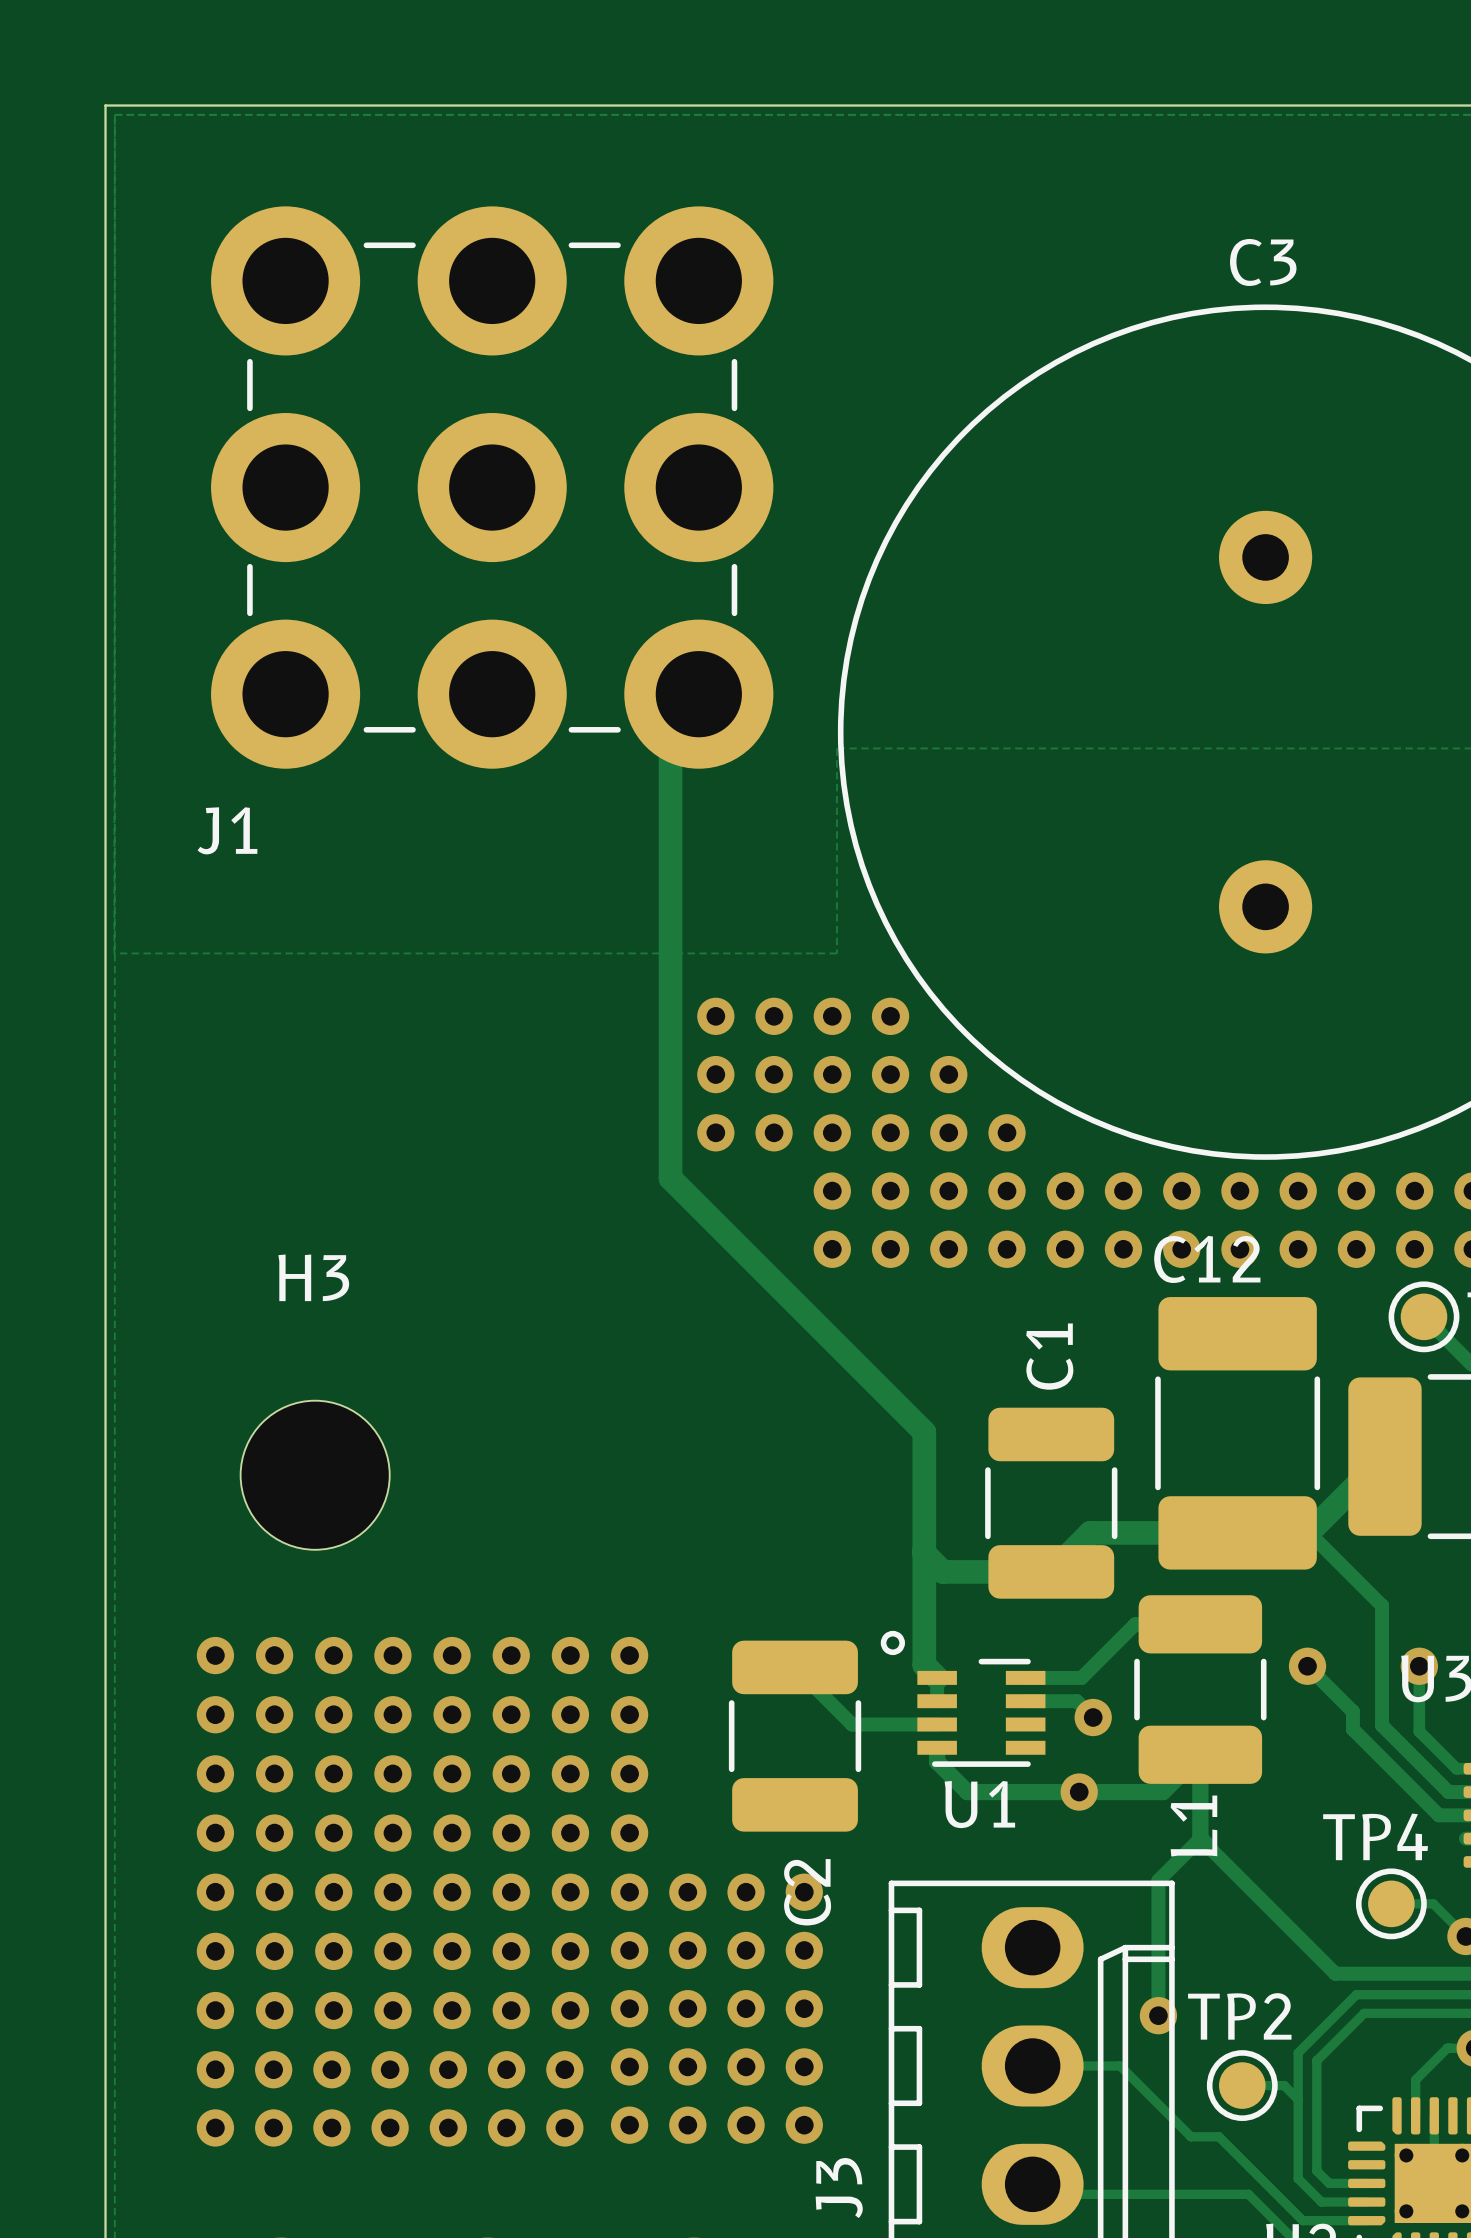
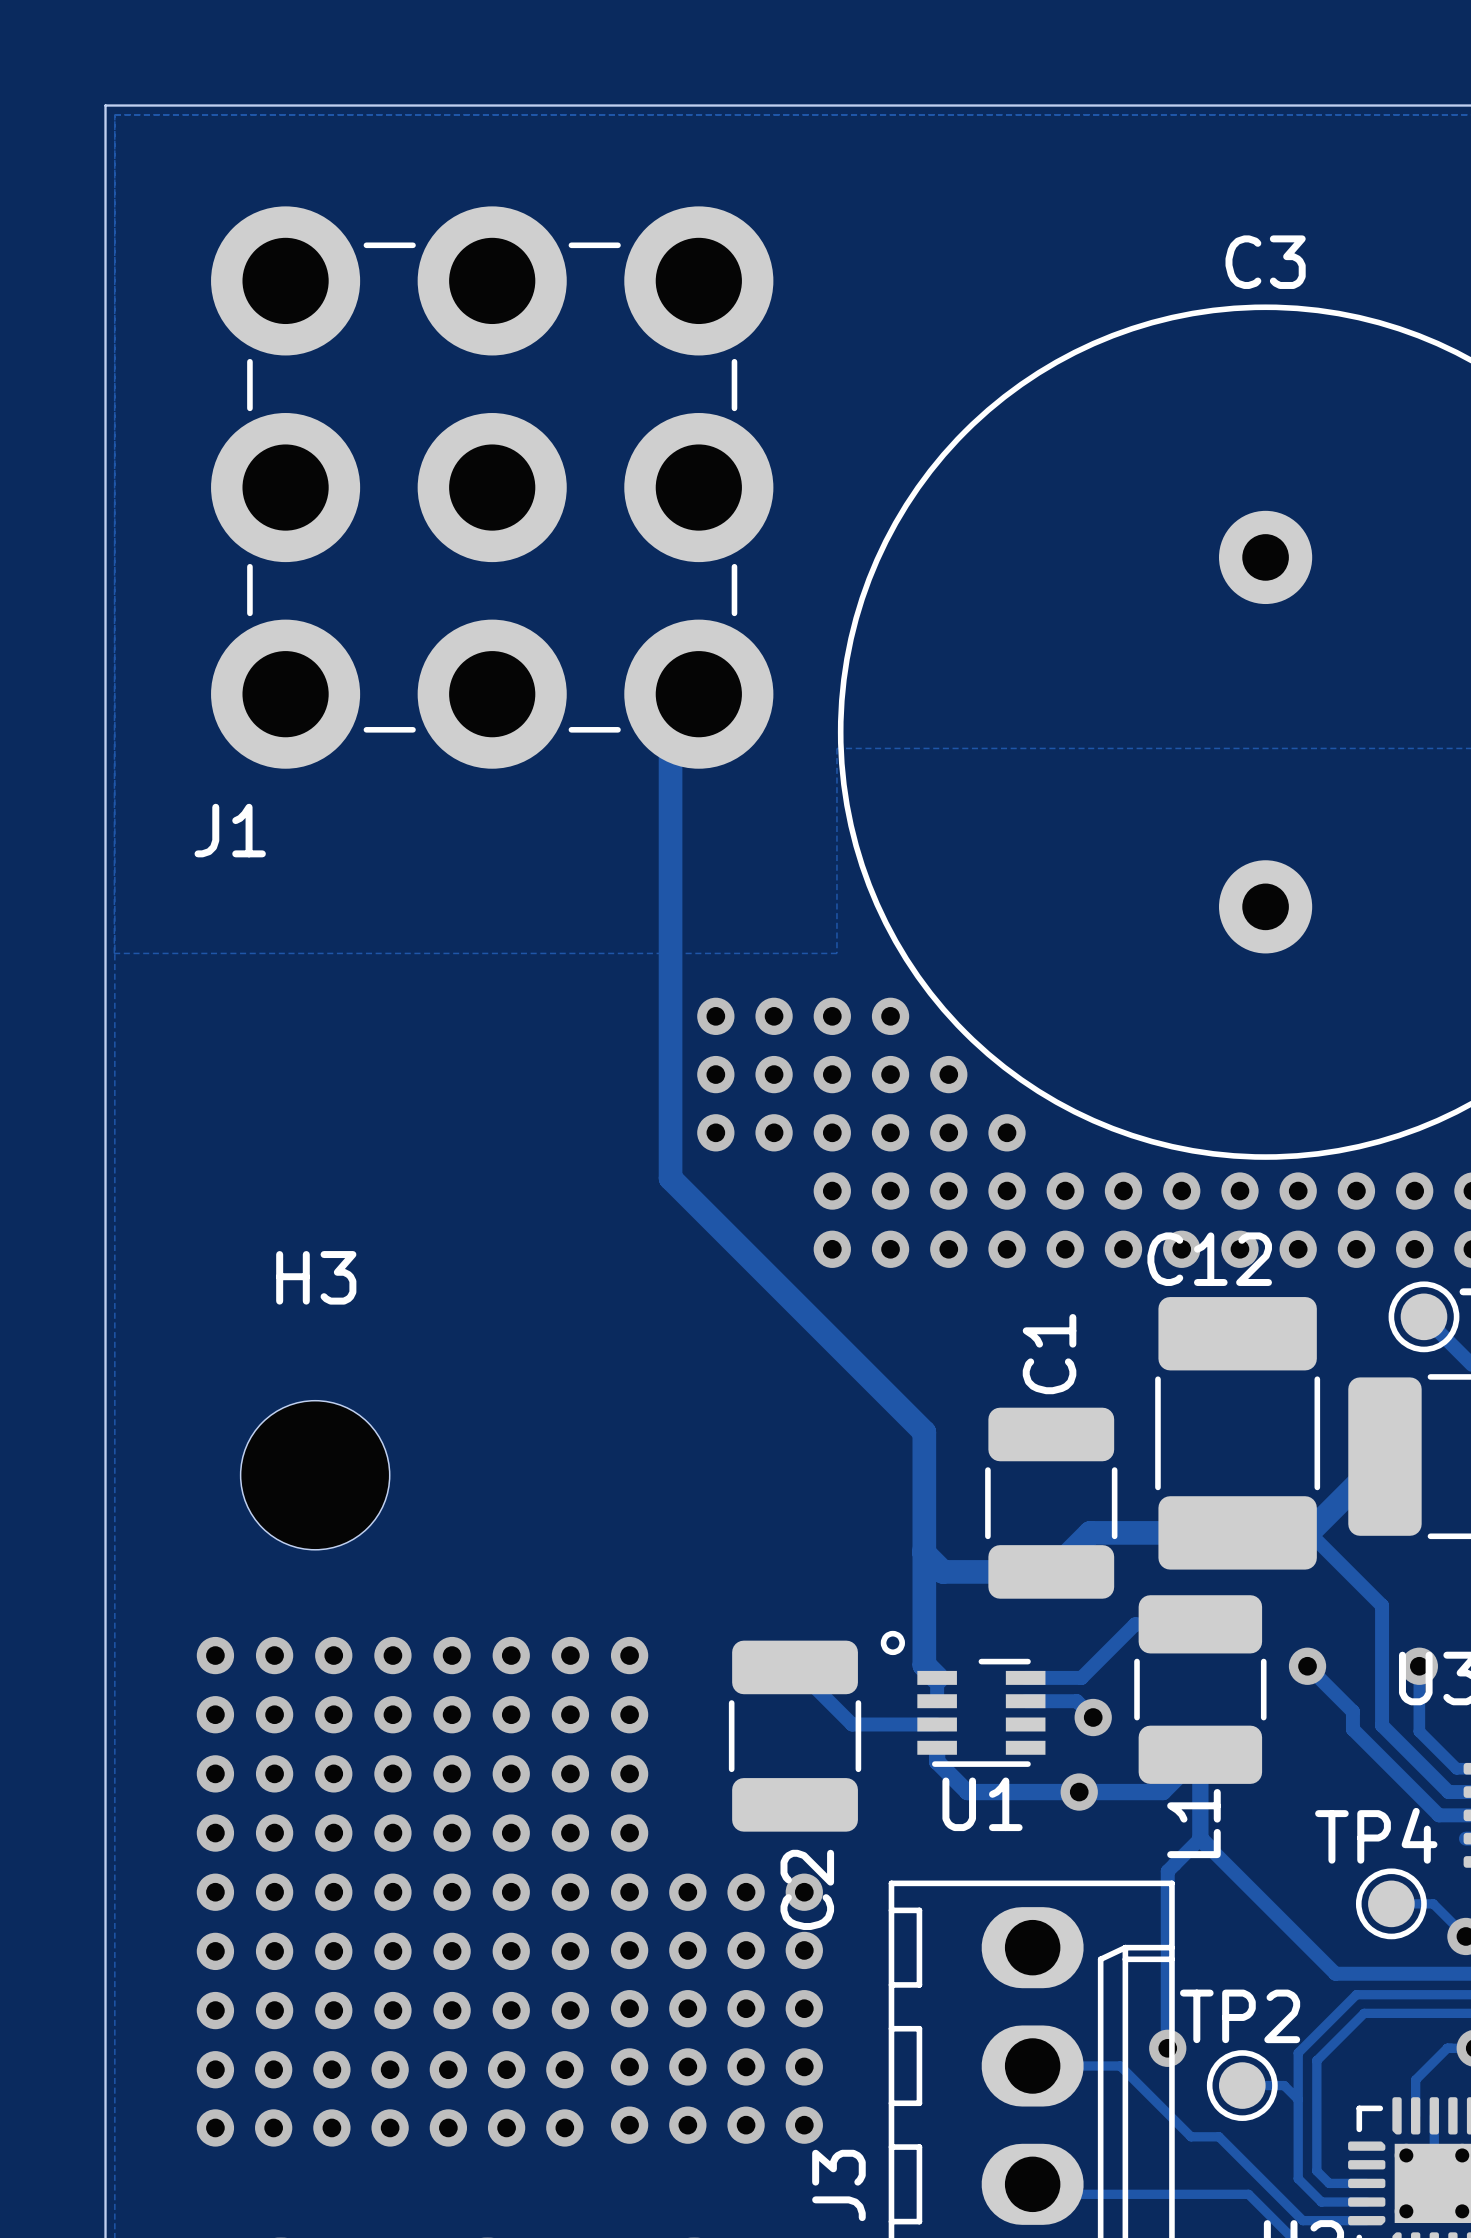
track: (1167, 1871) (1158, 1880) (1158, 2015) -> (1167, 1871) (1167, 2048)
via position: (1158, 2015) -> (1167, 2048)

